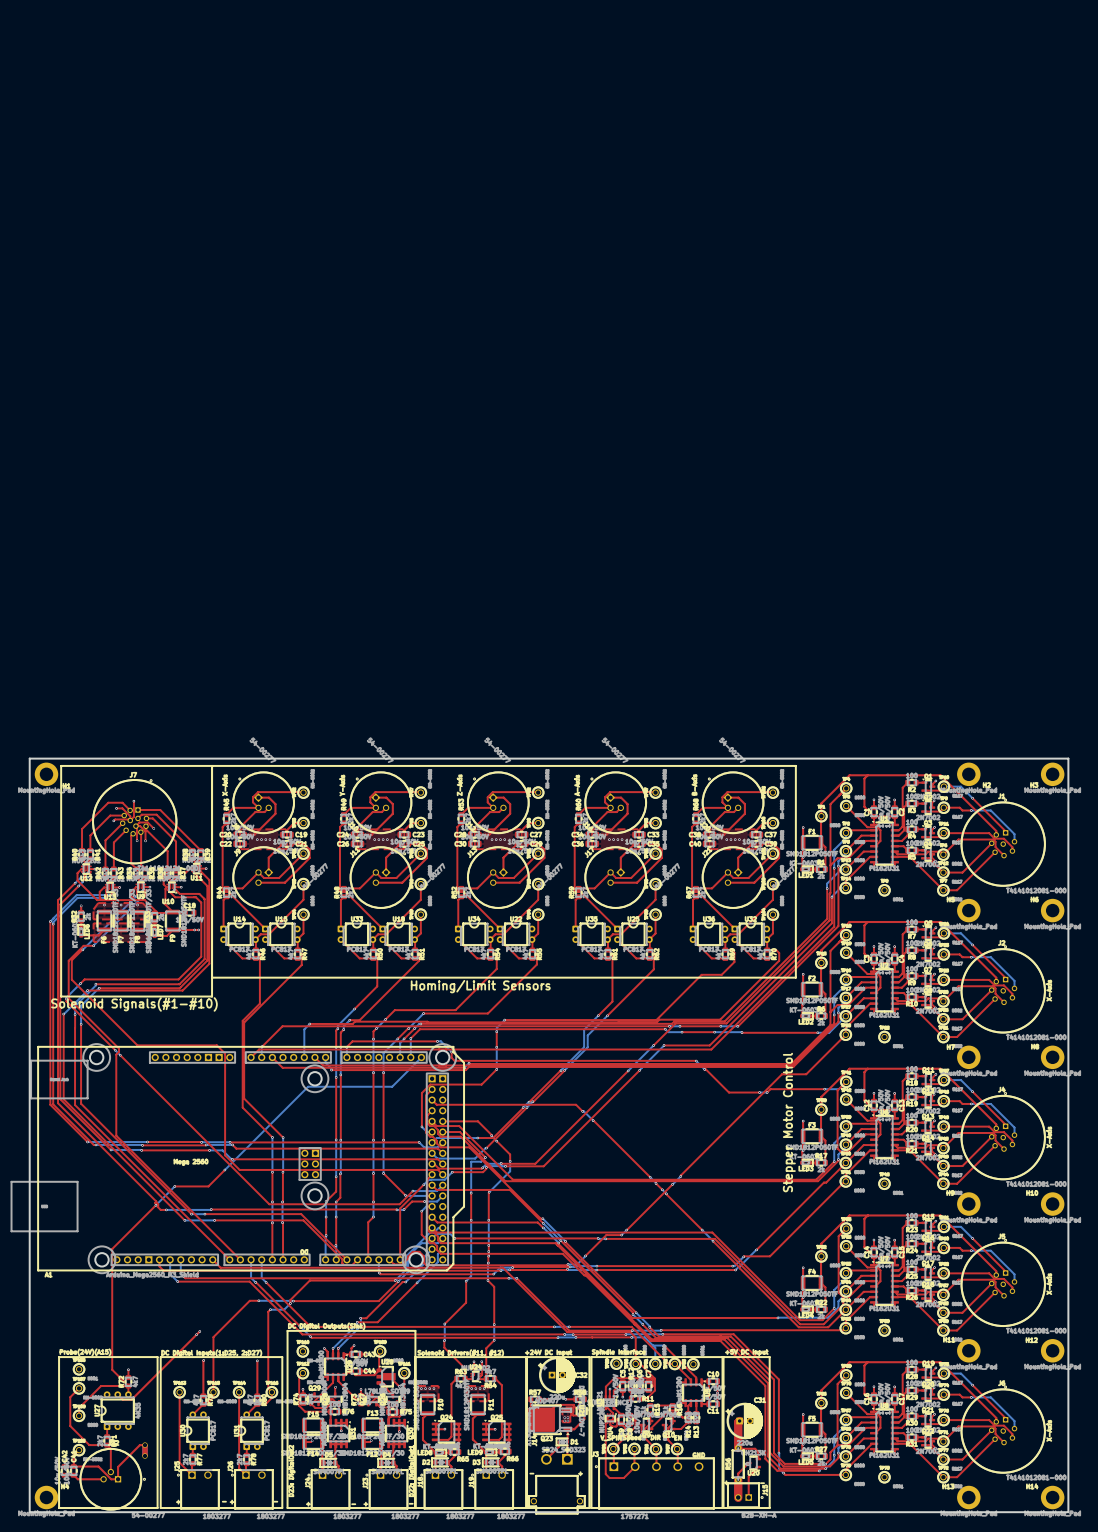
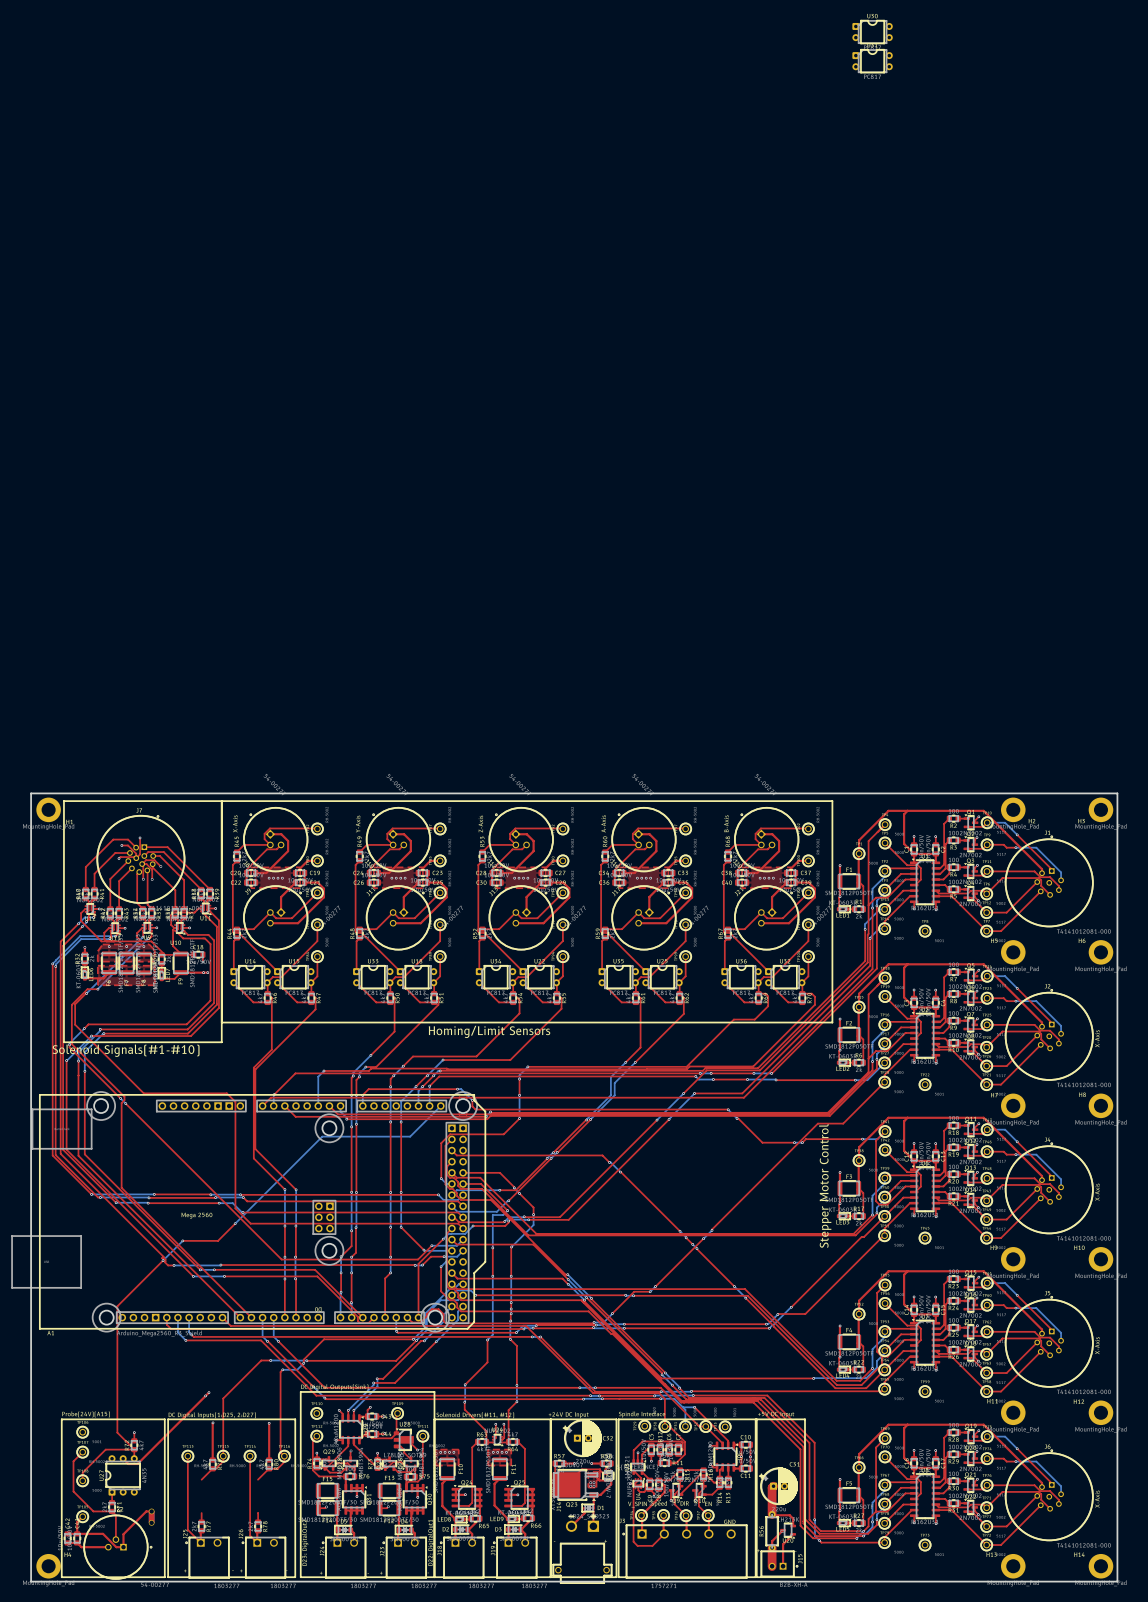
part rotation: 0° (198, 1430) -> 90° clockwise (872, 32)
part position: (198, 1430) -> (872, 32)
part rotation: 0° (251, 1430) -> 90° clockwise (872, 61)
part position: (251, 1430) -> (872, 61)

